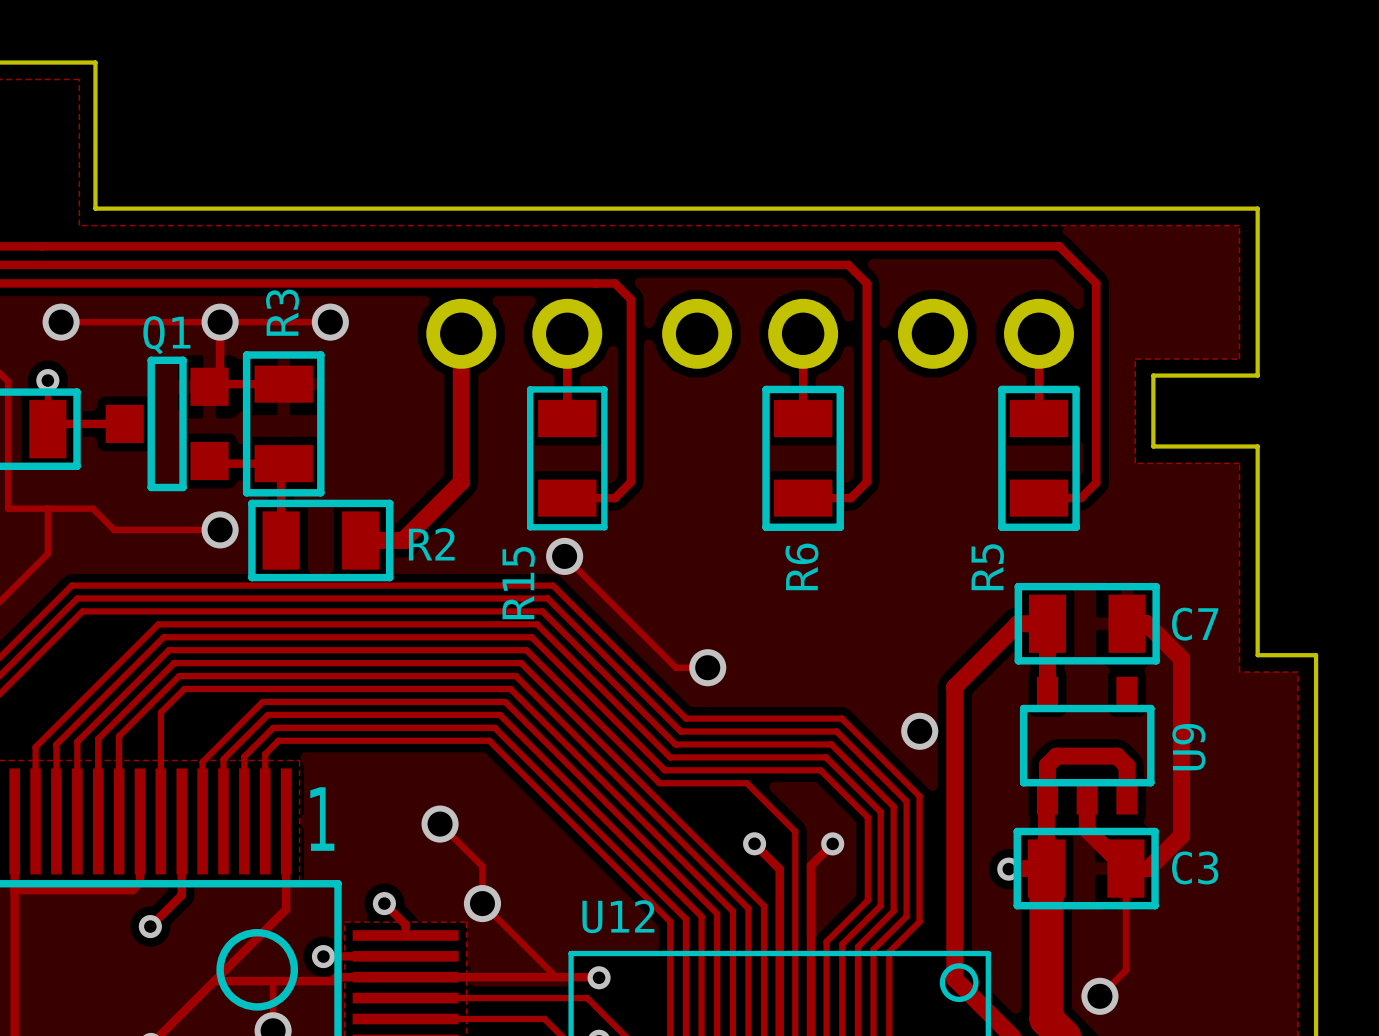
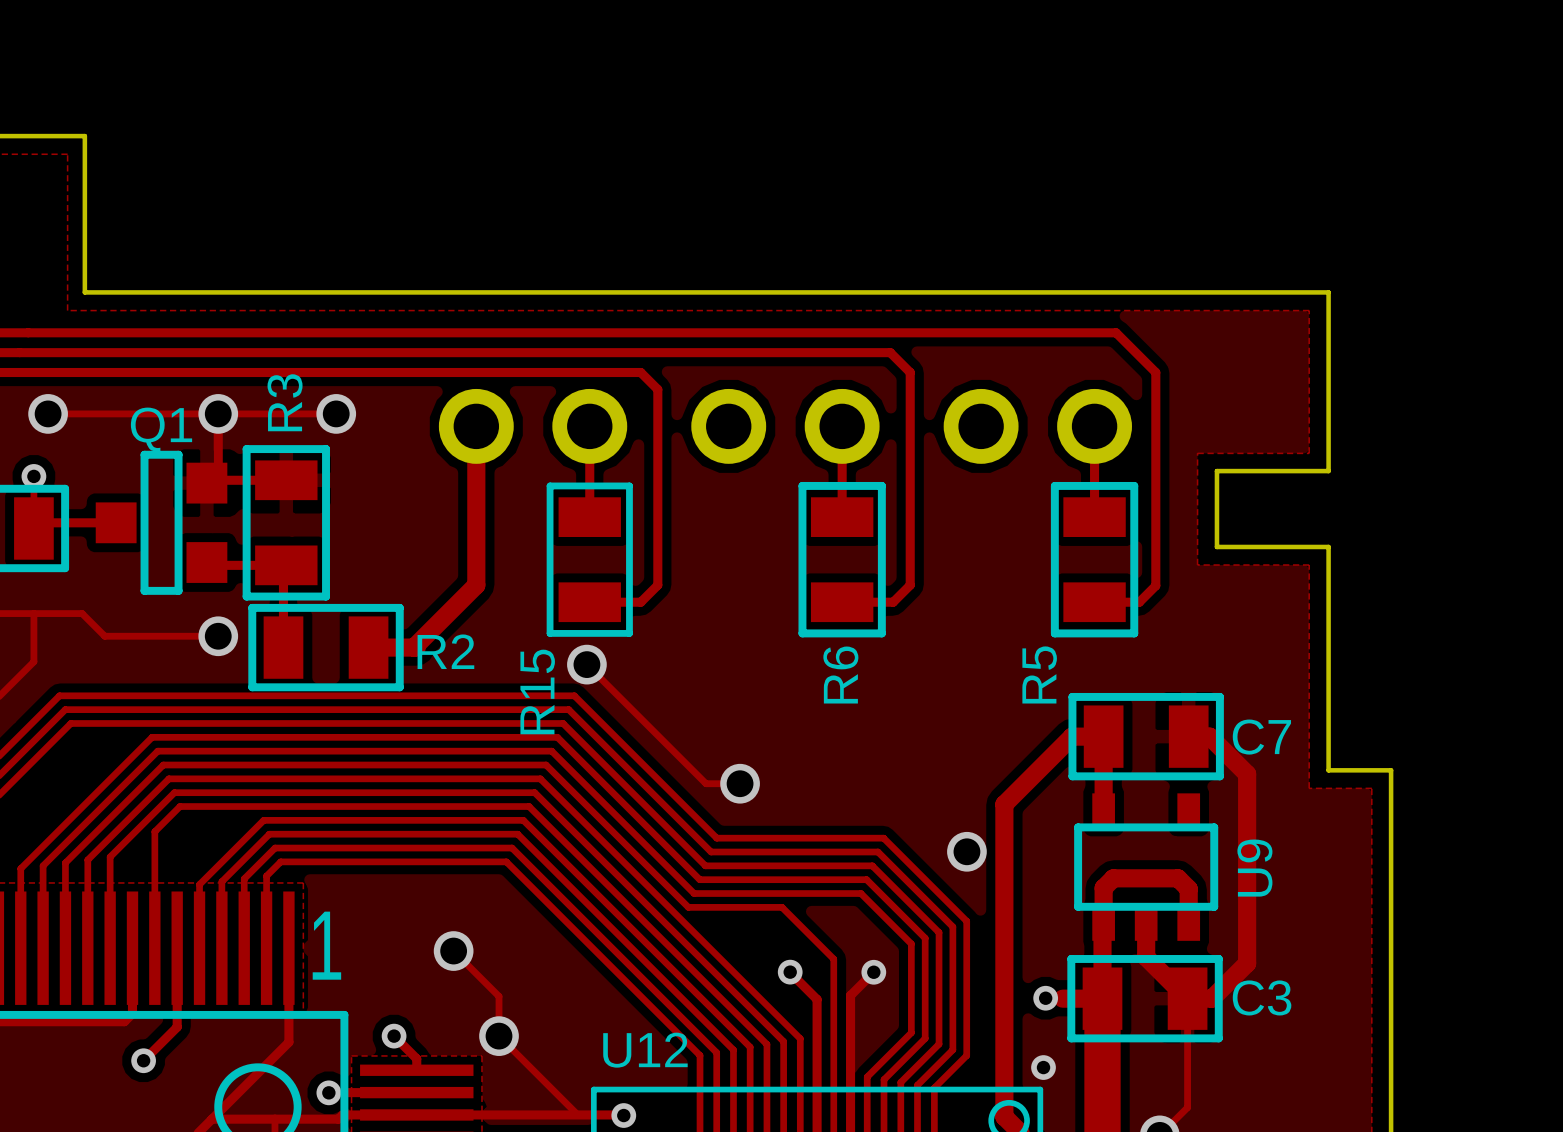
via position: (1008, 869) -> (1045, 998)
via: none -> (1043, 1067)

